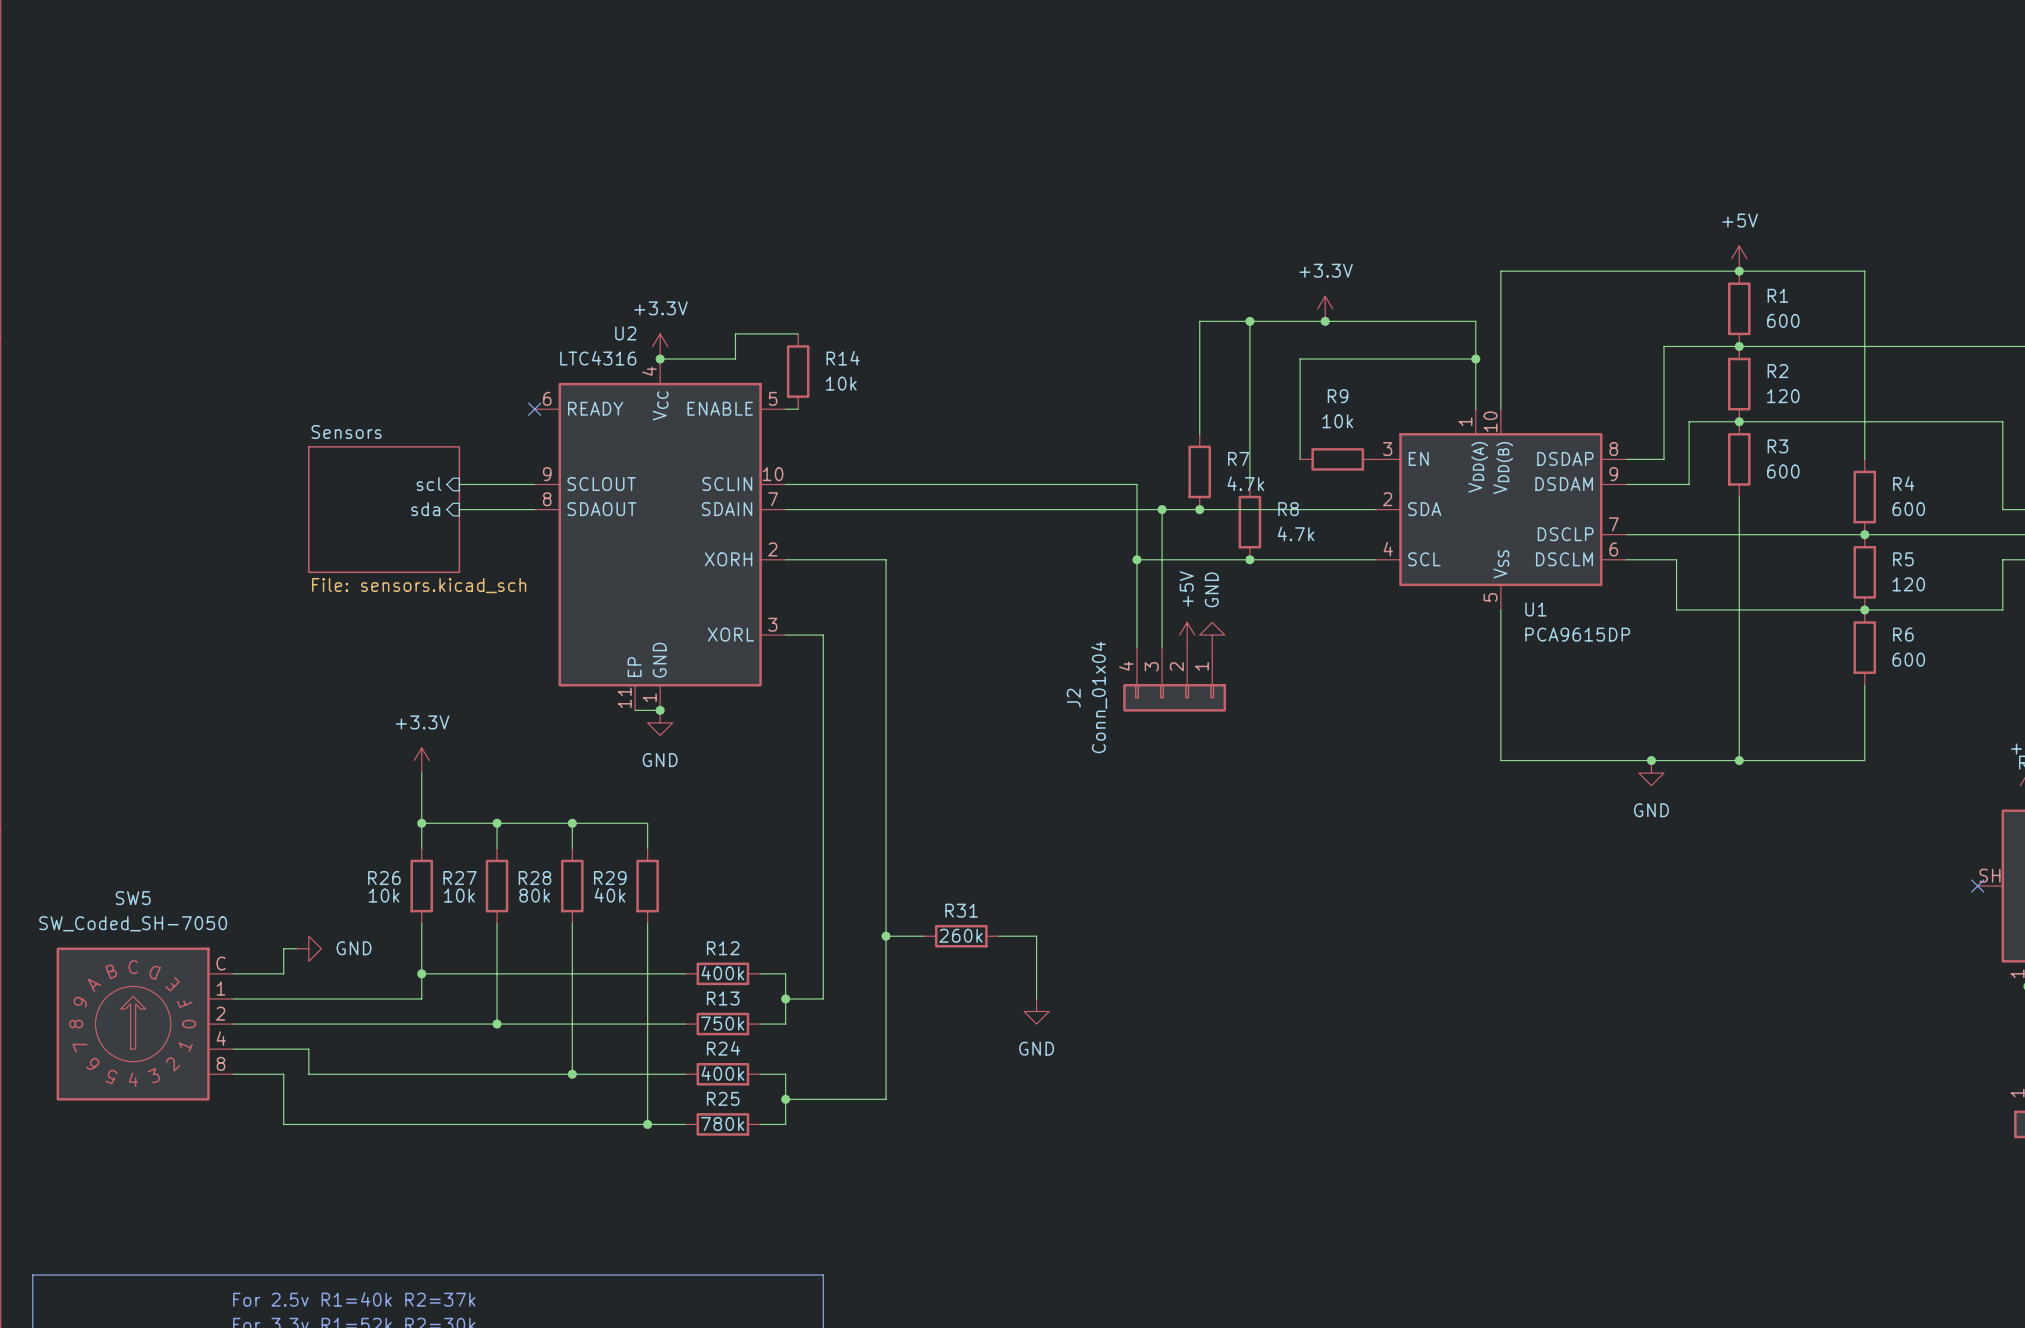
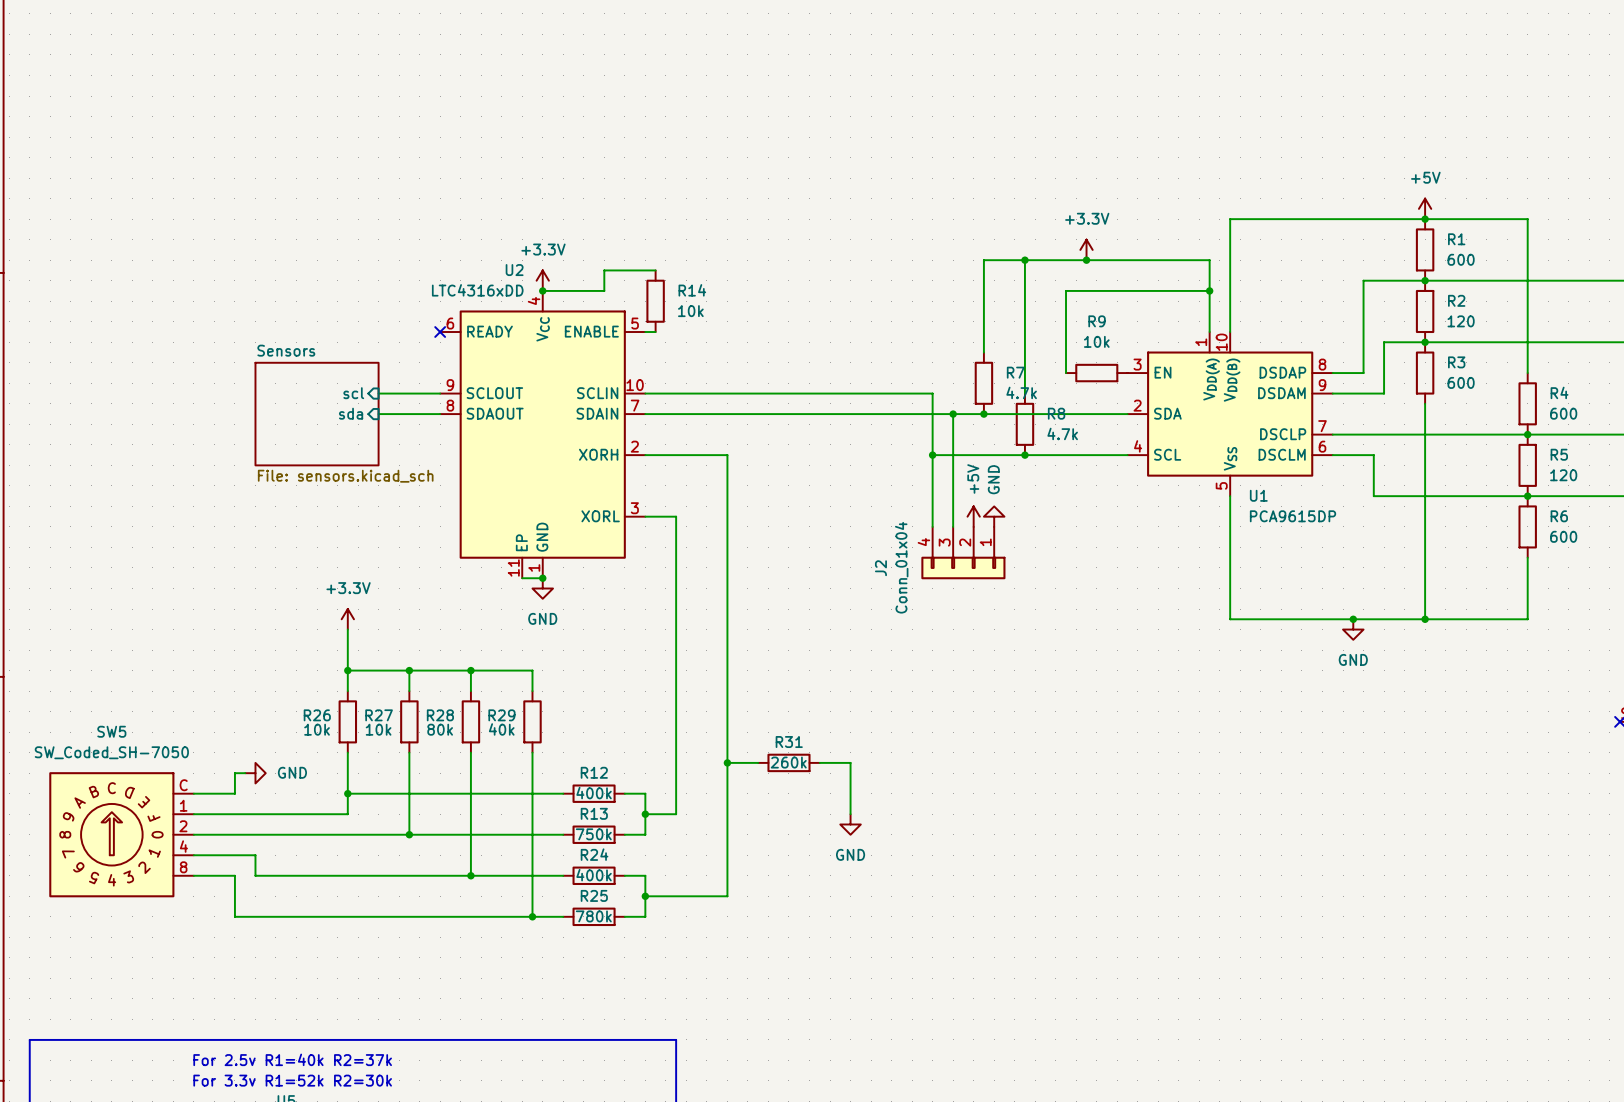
U2 value: LTC4316 (598, 358) -> LTC4316xDD (477, 290)

